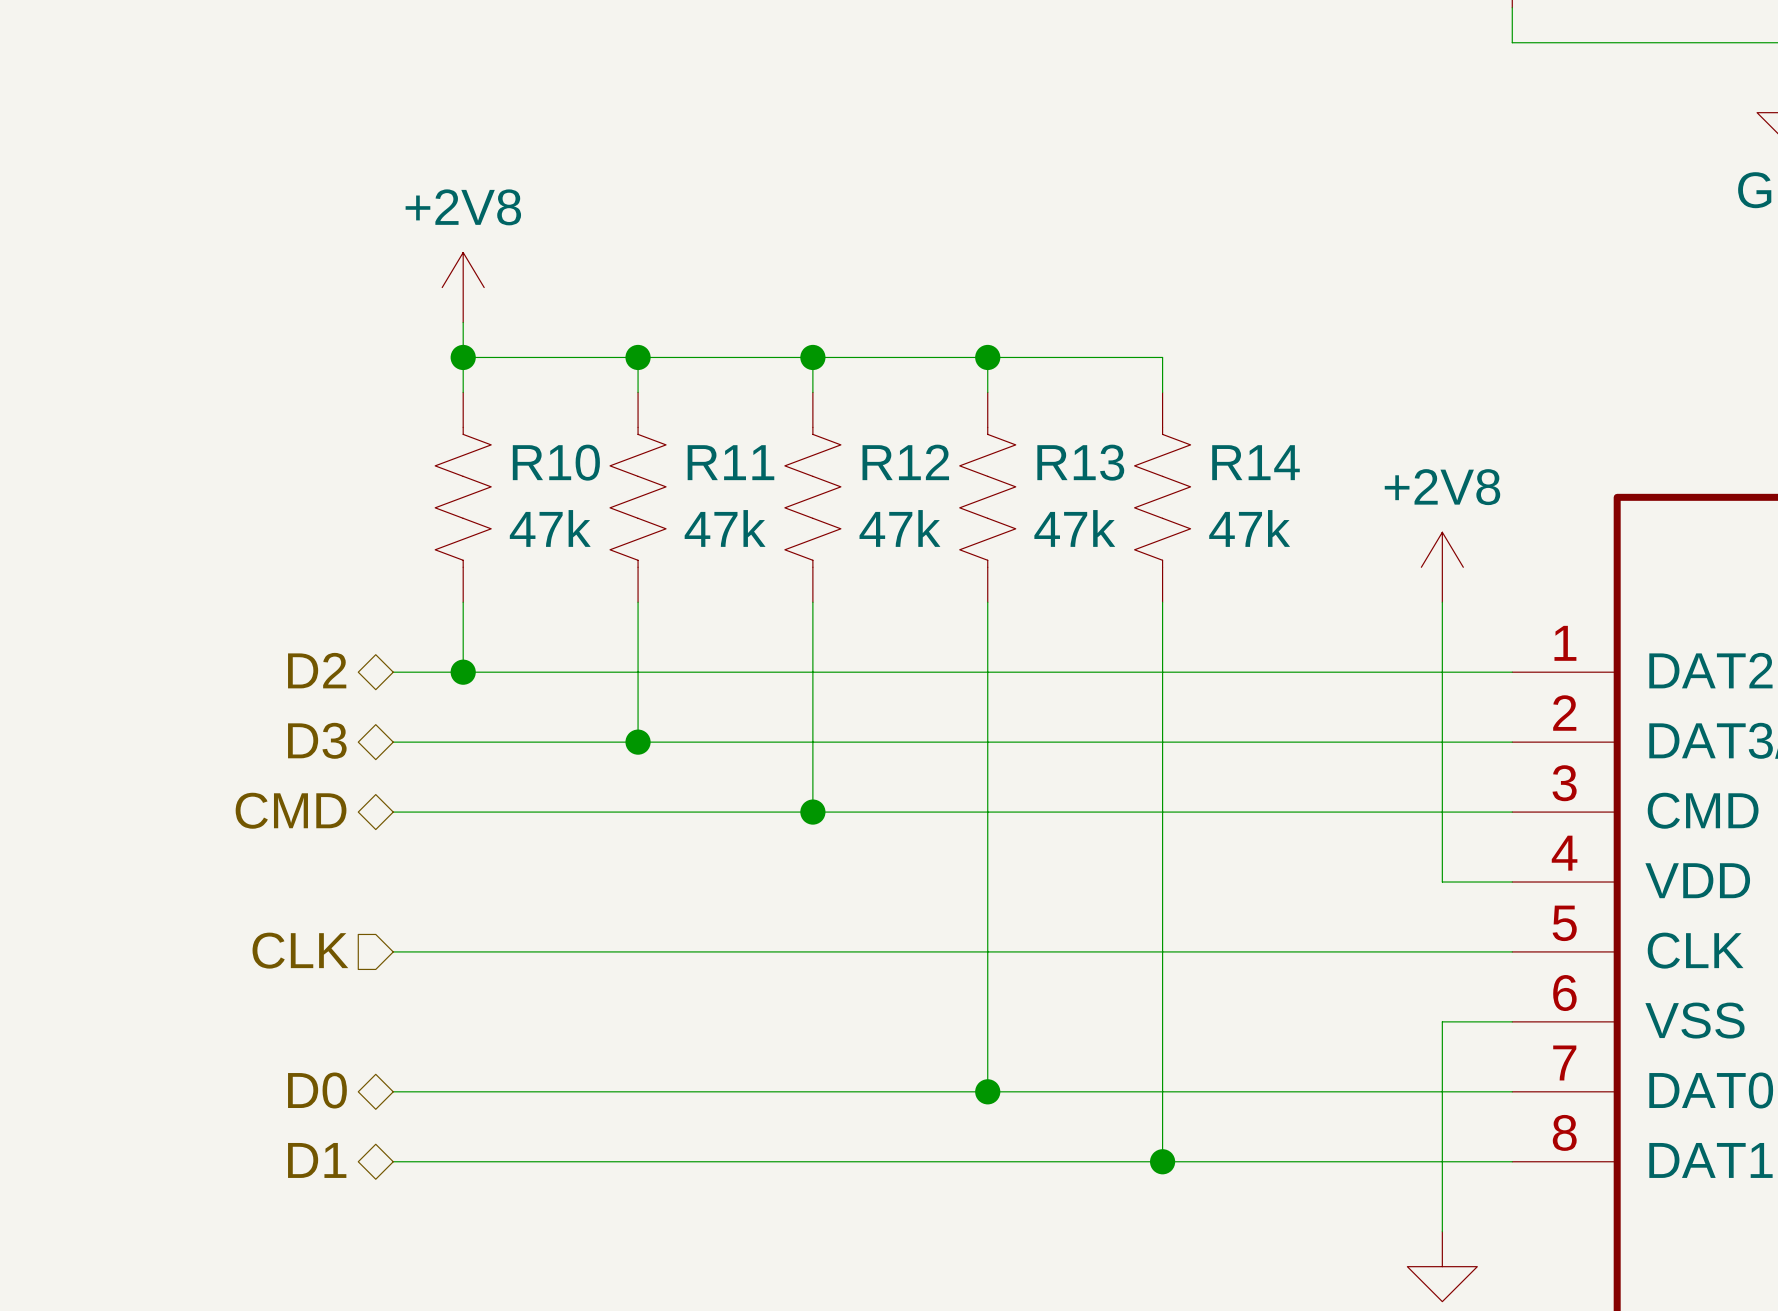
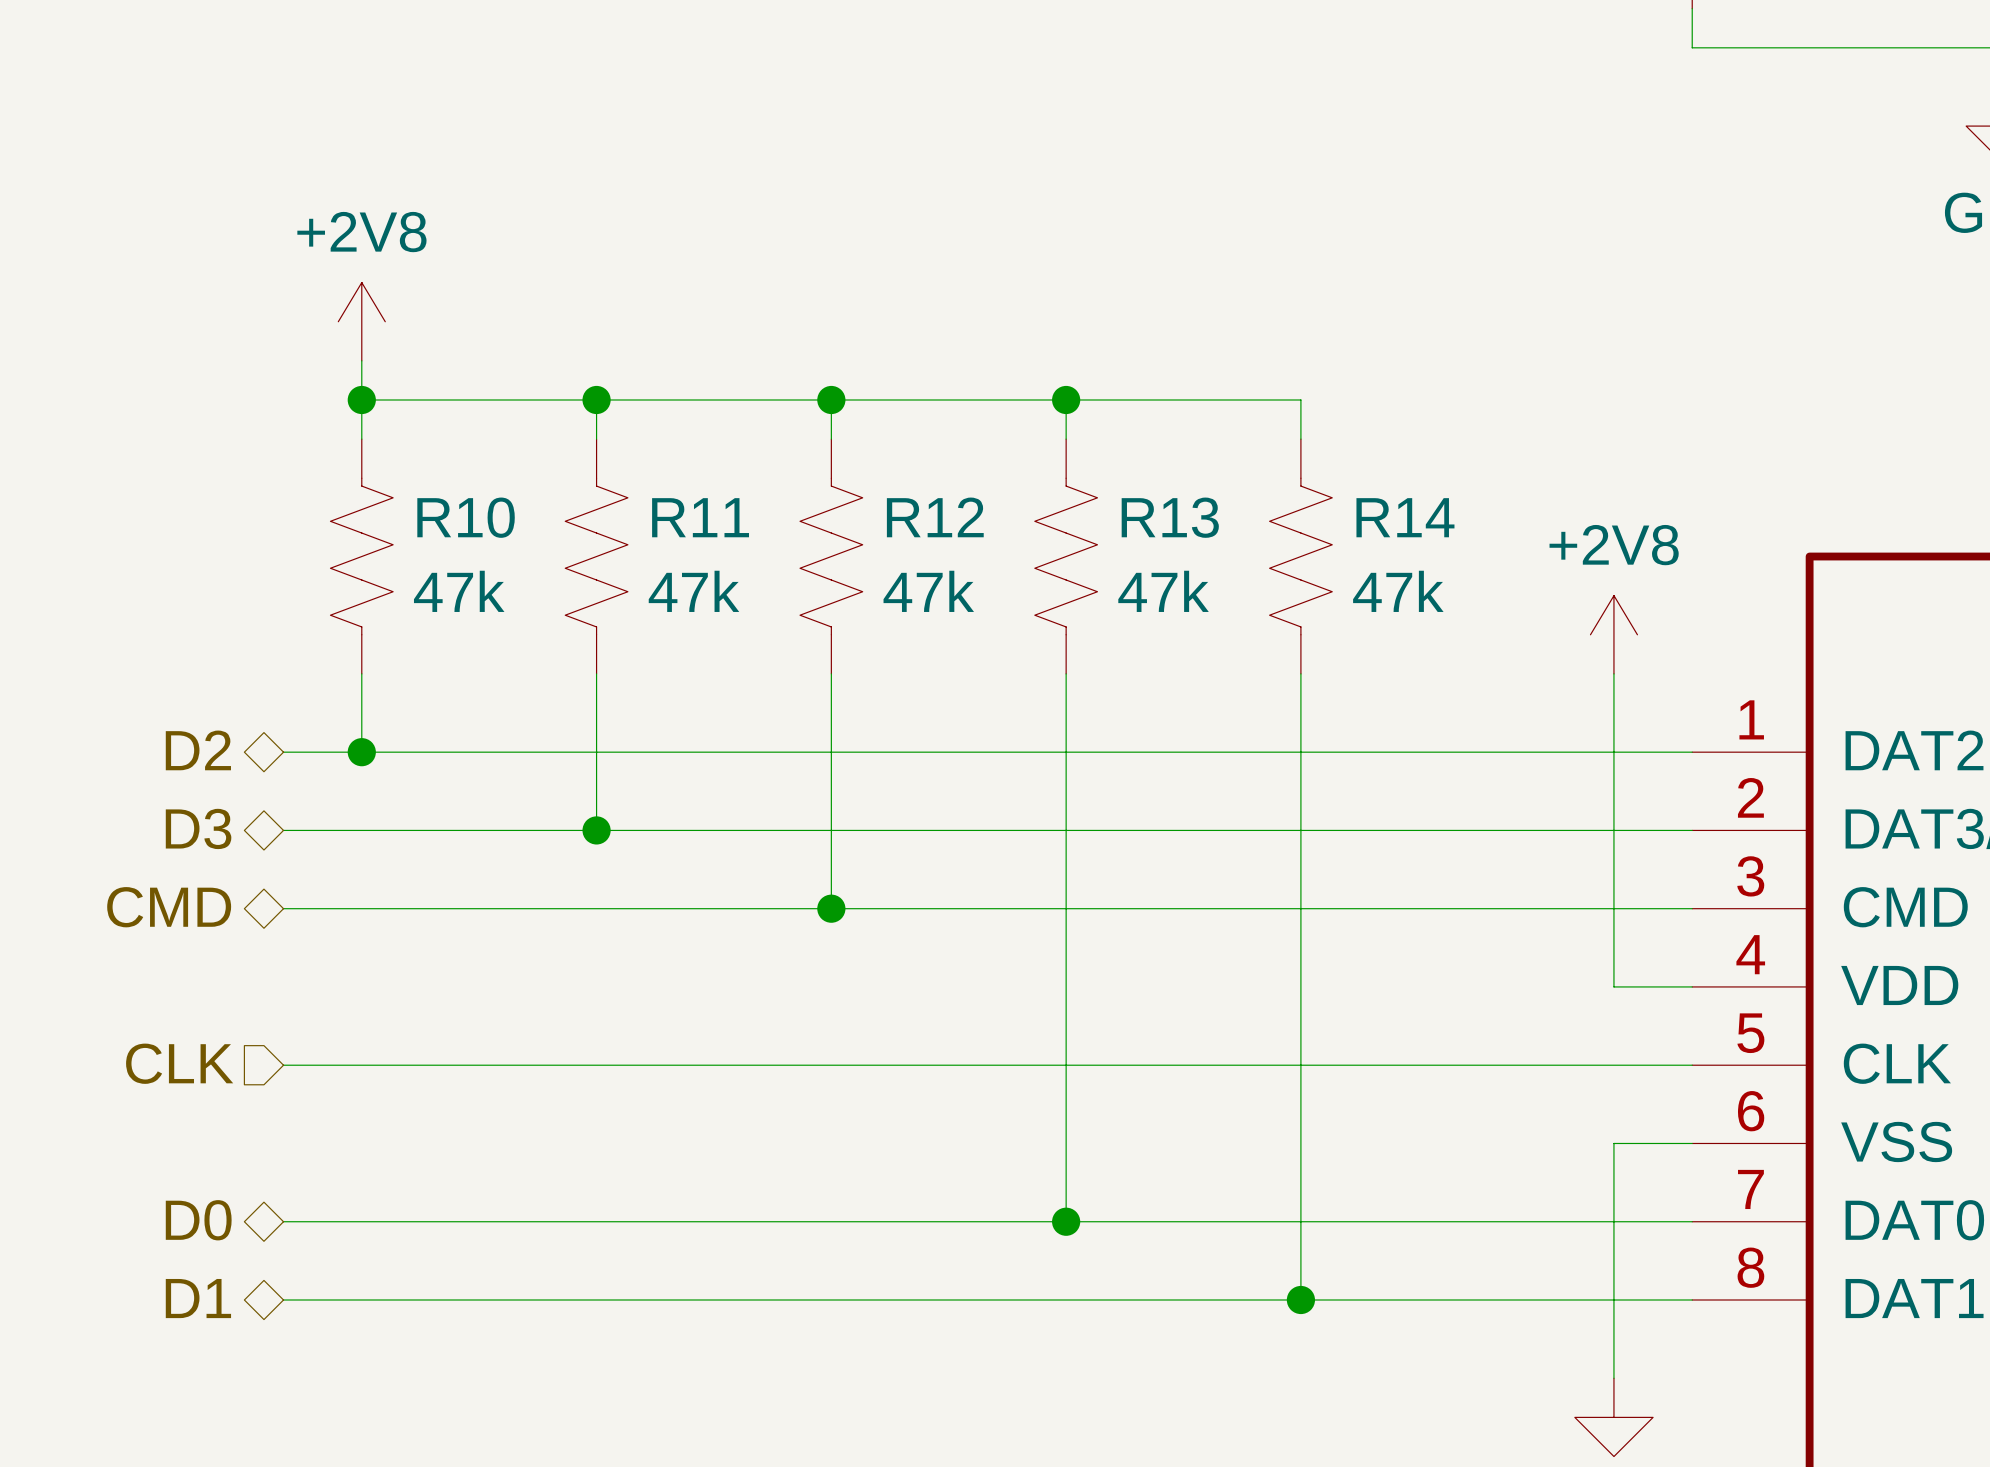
power symbol position: +2V8 (463, 287) -> +2V8 (361, 321)
wire: (463, 322) (463, 392) -> (361, 360) (361, 439)
wire: none -> (361, 399) (518, 399)
junction: none -> (361, 399)
junction: (463, 357) -> none
junction: none -> (596, 399)
wire: (638, 357) (638, 392) -> (596, 399) (596, 439)
junction: (638, 357) -> none
junction: none -> (831, 399)
wire: (812, 357) (812, 392) -> (831, 399) (831, 439)
junction: (812, 357) -> none
wire: (987, 357) (987, 392) -> (1066, 399) (1066, 439)
junction position: (987, 357) -> (1066, 399)
R10 position: (463, 497) -> (361, 556)
R11 position: (638, 497) -> (596, 556)
R12 position: (812, 497) -> (831, 556)
R13 position: (987, 497) -> (1066, 556)
wire: (463, 602) (463, 672) -> (361, 673) (361, 752)
wire: (638, 602) (638, 742) -> (596, 673) (596, 830)
wire: (812, 602) (812, 812) -> (831, 673) (831, 908)
wire: (987, 602) (987, 1091) -> (1066, 673) (1066, 1221)
hierarchical label position: D2 (317, 670) -> D2 (198, 750)
wire: none -> (283, 752) (440, 752)
junction: none -> (361, 752)
junction: (463, 672) -> none
hierarchical label position: D3 (317, 740) -> D3 (198, 828)
wire: none -> (283, 830) (440, 830)
junction: none -> (596, 830)
junction: (638, 742) -> none
hierarchical label position: CMD (291, 810) -> CMD (169, 907)
wire: none -> (283, 908) (440, 908)
junction: none -> (831, 908)
junction: (812, 812) -> none
hierarchical label position: CLK (300, 950) -> CLK (179, 1063)
wire: none -> (283, 1065) (440, 1065)
hierarchical label position: D0 (317, 1090) -> D0 (198, 1220)
wire: none -> (283, 1221) (440, 1221)
junction position: (987, 1091) -> (1066, 1221)
hierarchical label position: D1 (317, 1160) -> D1 (198, 1298)
wire: none -> (283, 1300) (440, 1300)

